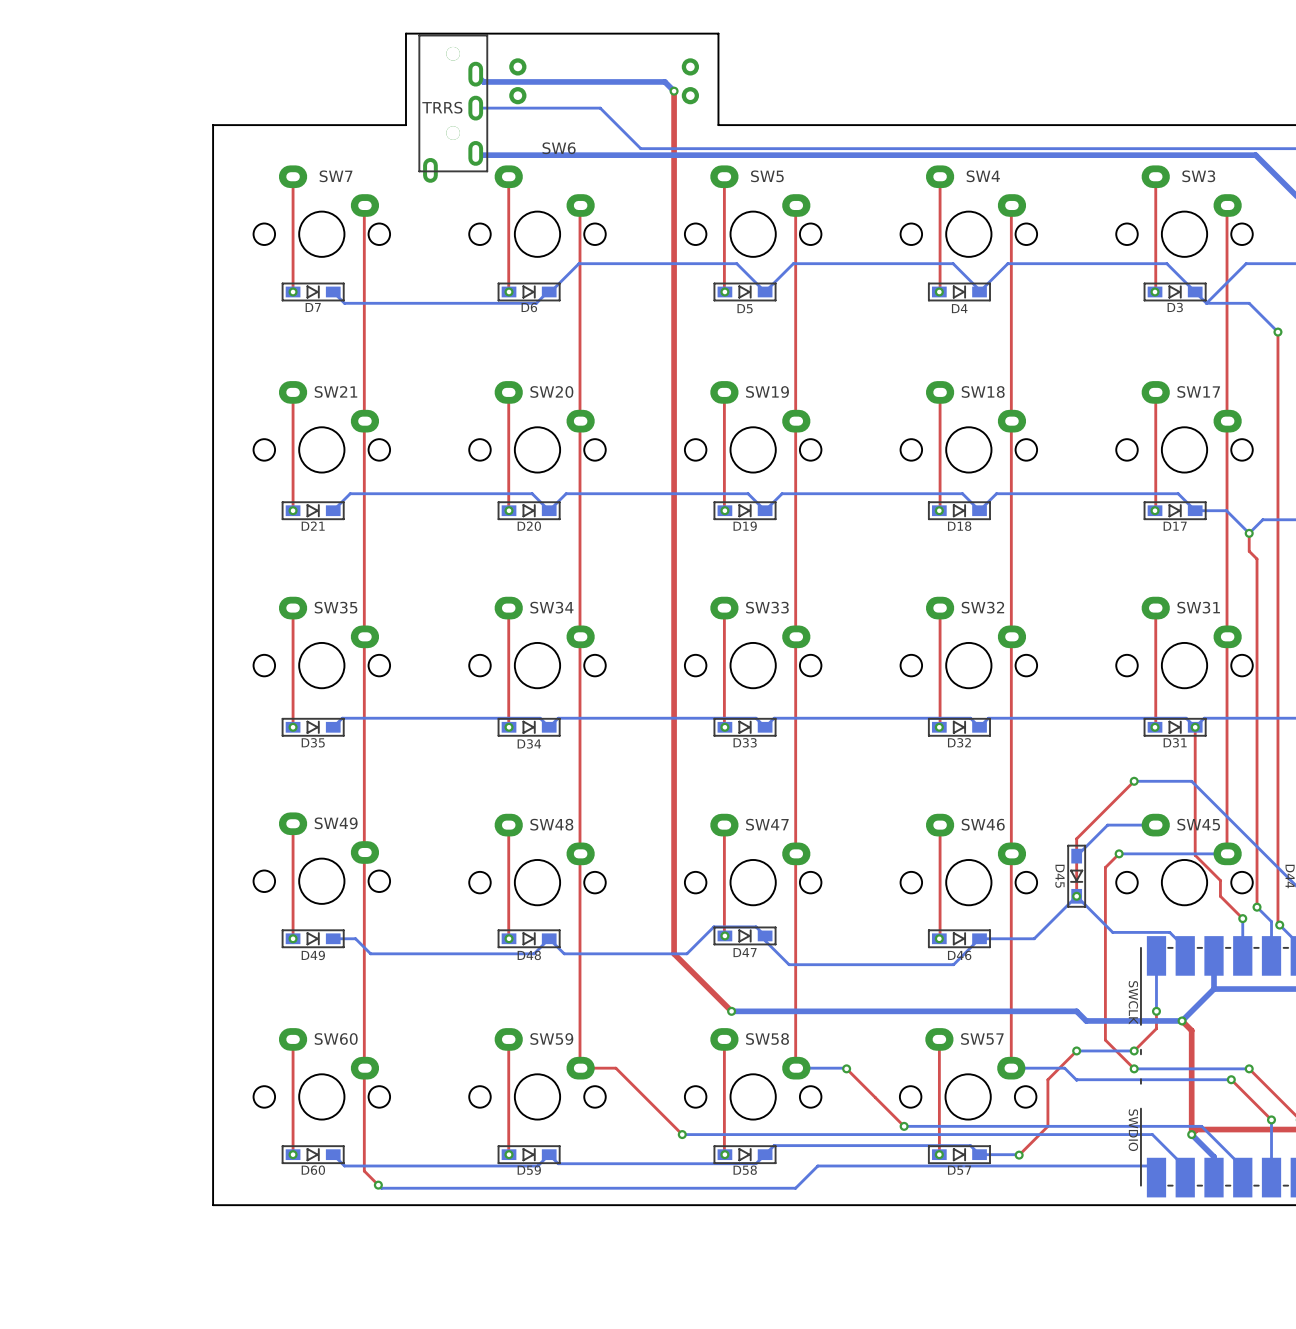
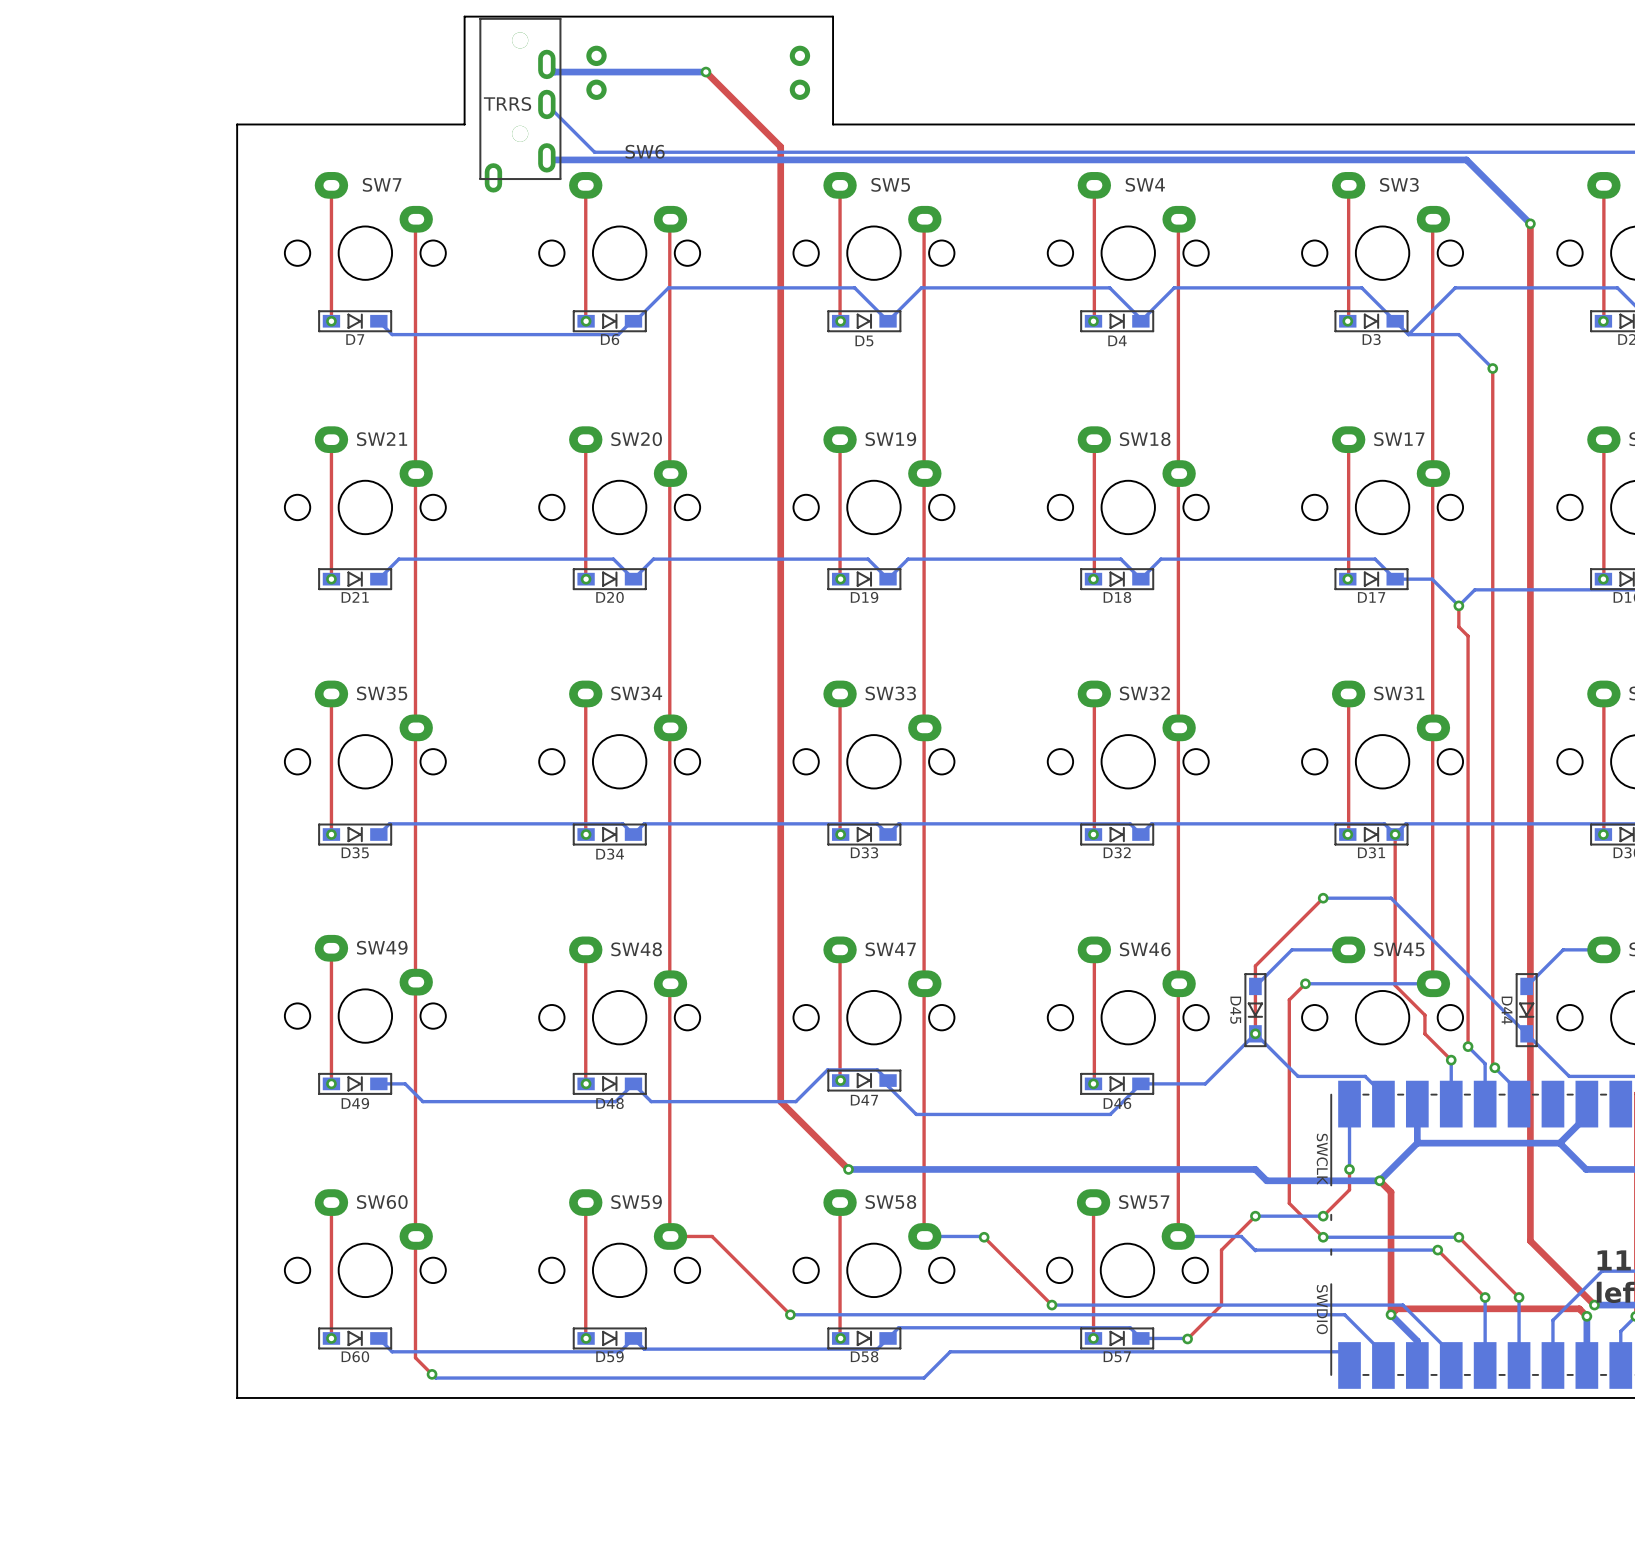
bottom track: (482, 80) (664, 81) (674, 91) -> (554, 72) (705, 72)
top track: (674, 91) (674, 144) -> (705, 72) (780, 146)
via position: (674, 91) -> (705, 72)
bottom track: (475, 108) (600, 108) (640, 148) -> (546, 104) (594, 152) (741, 152)

